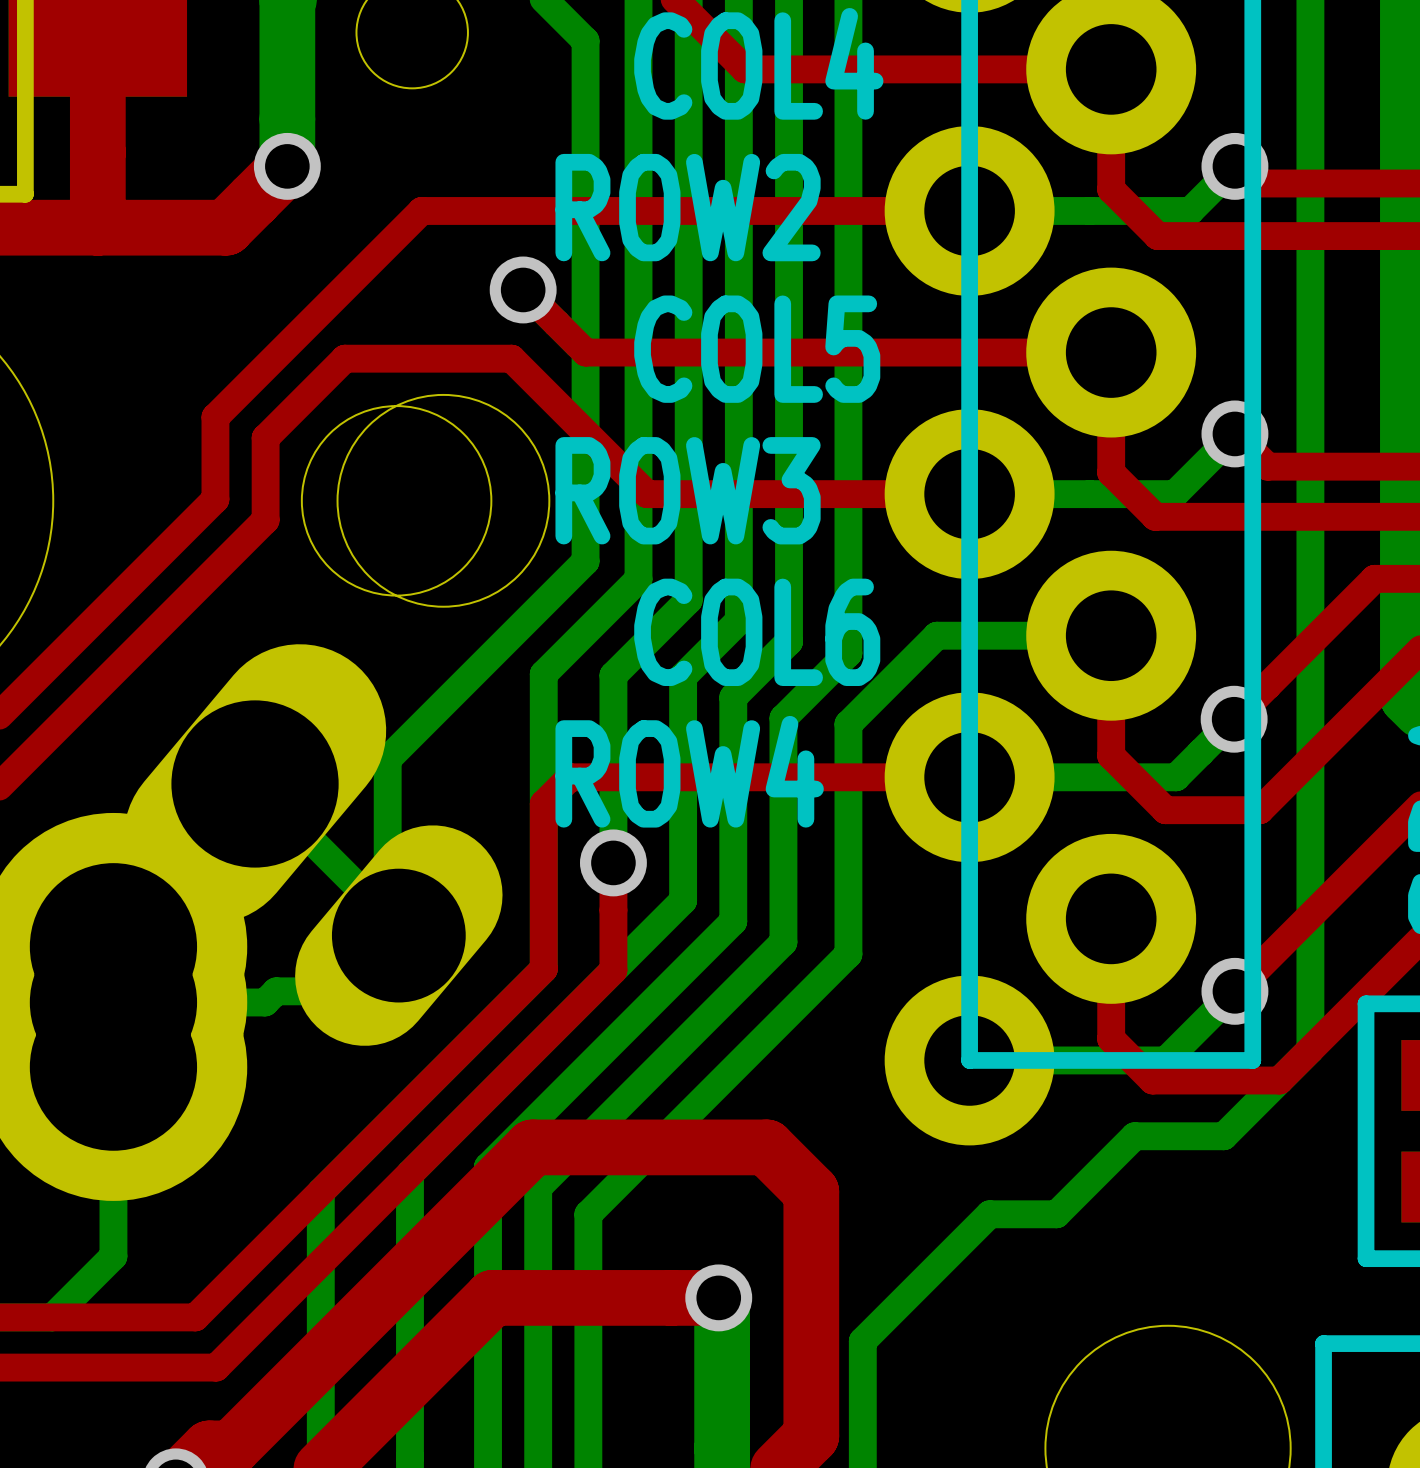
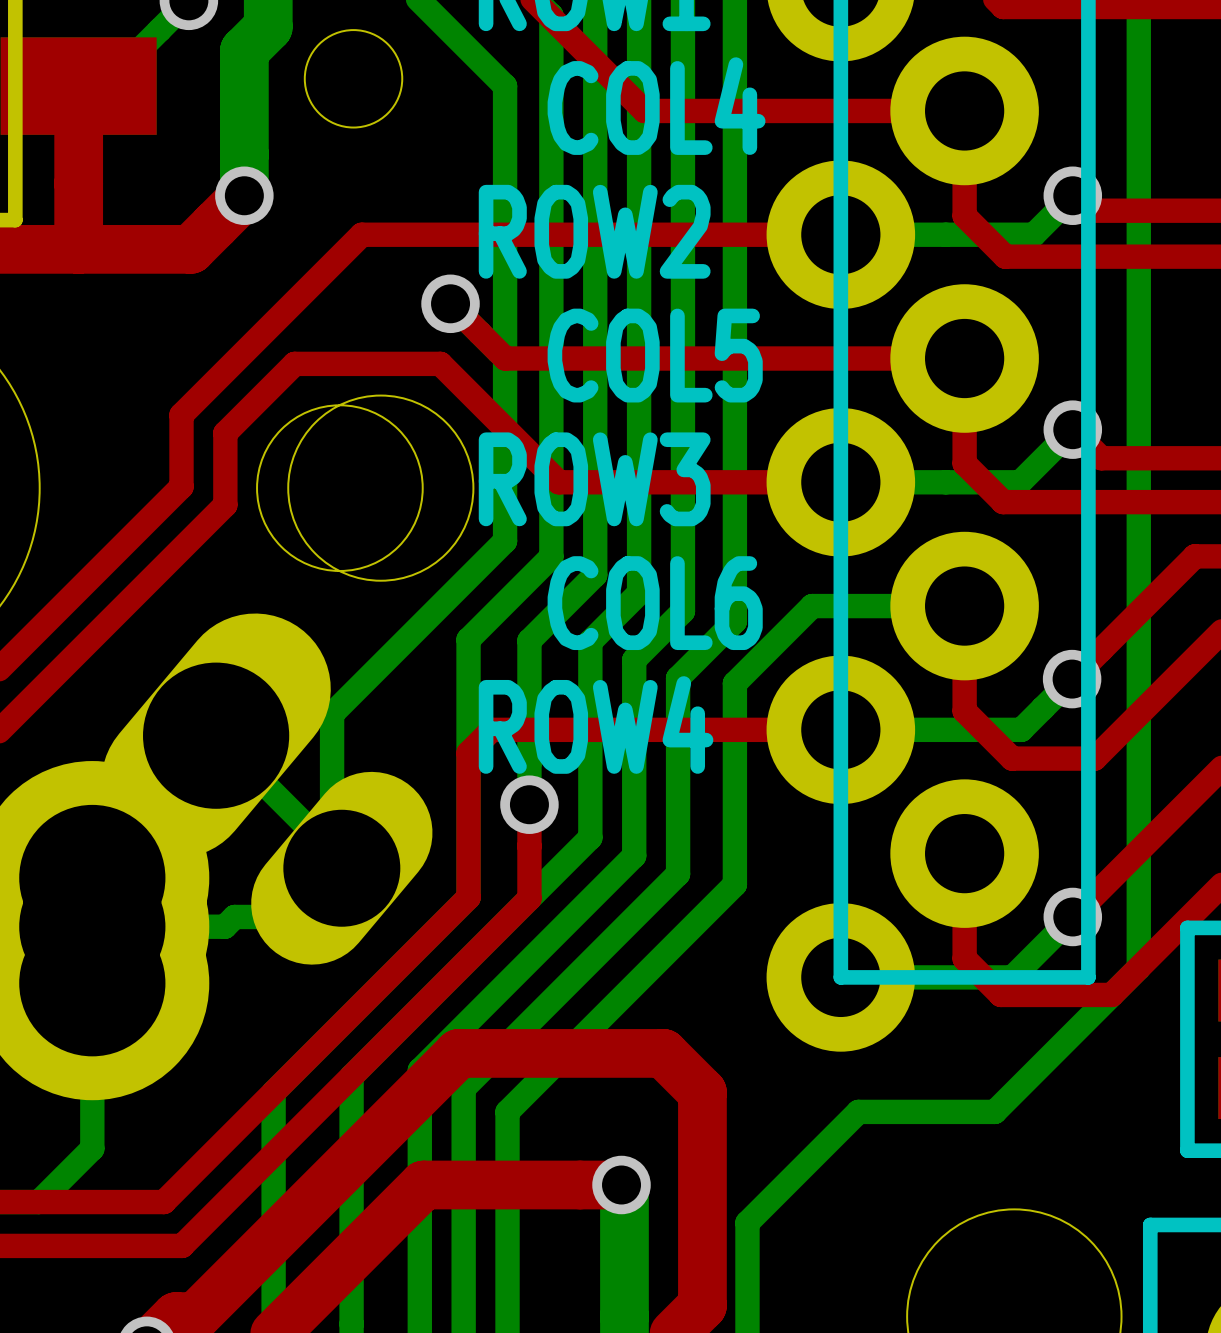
bottom track: (1223, 1136) (1134, 1136) (1056, 1214) -> (1063, 1043) (994, 1111) (916, 1111)

